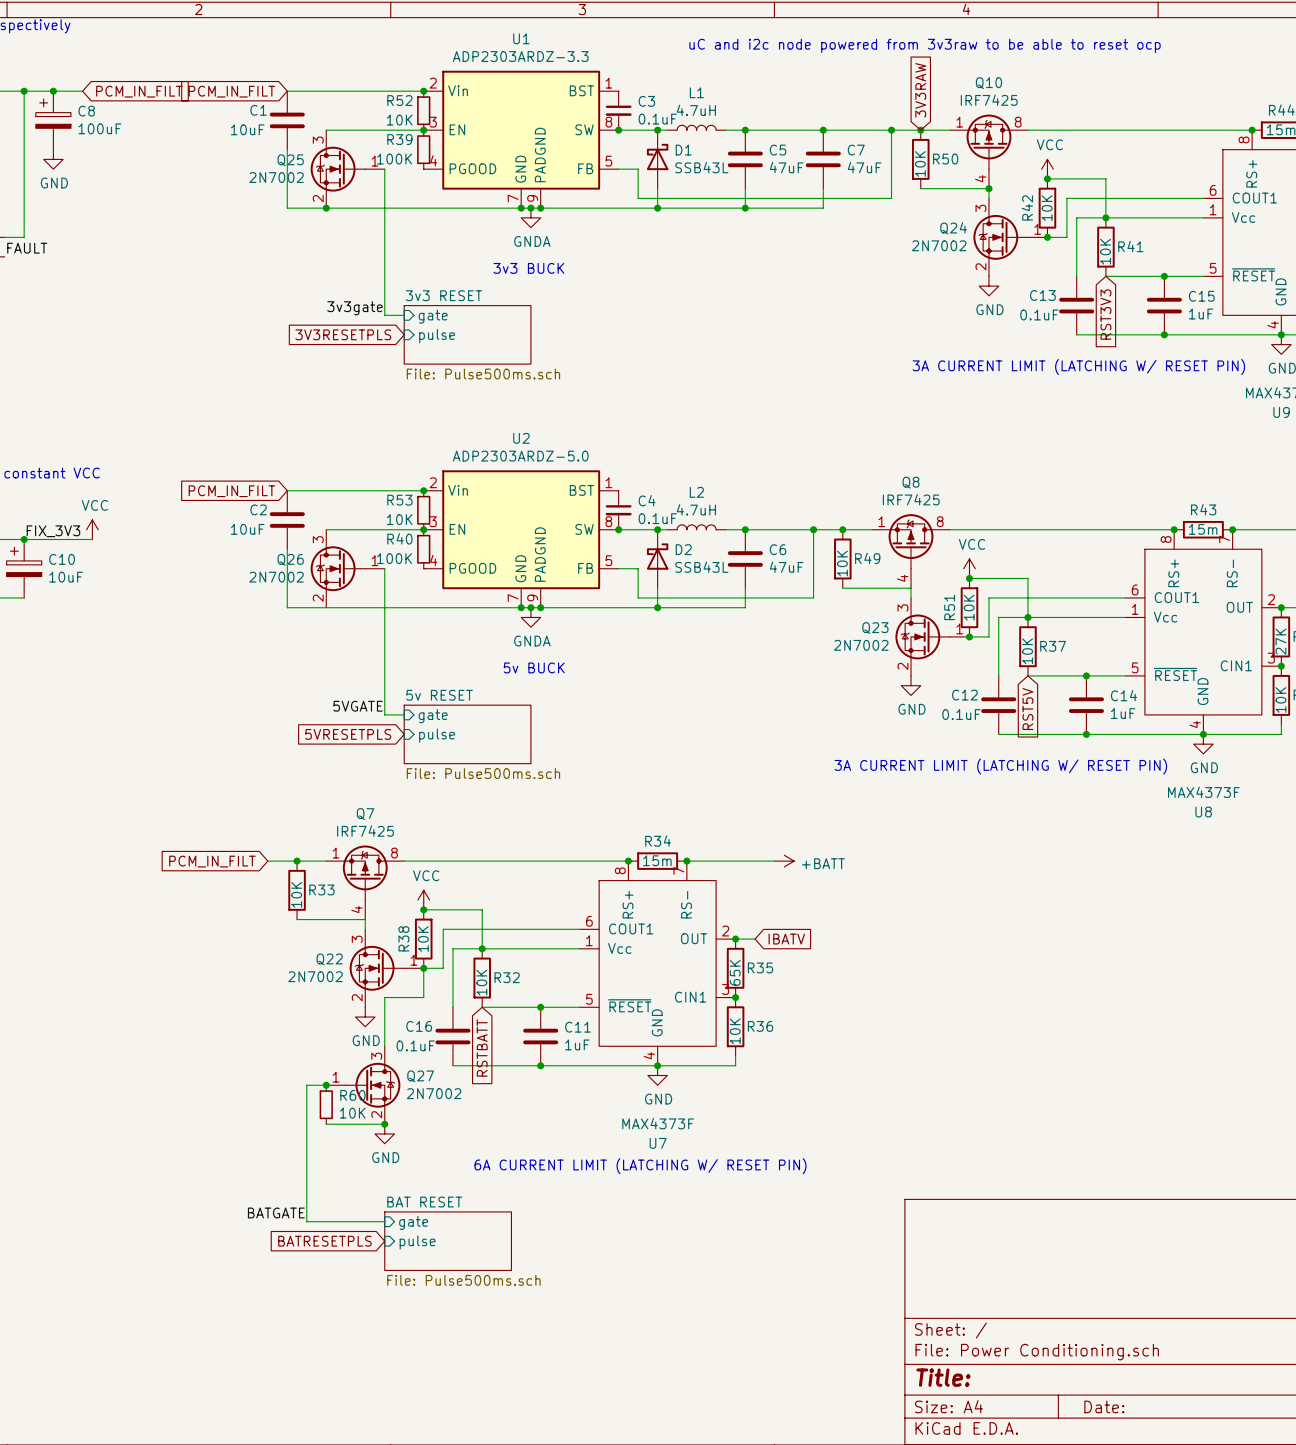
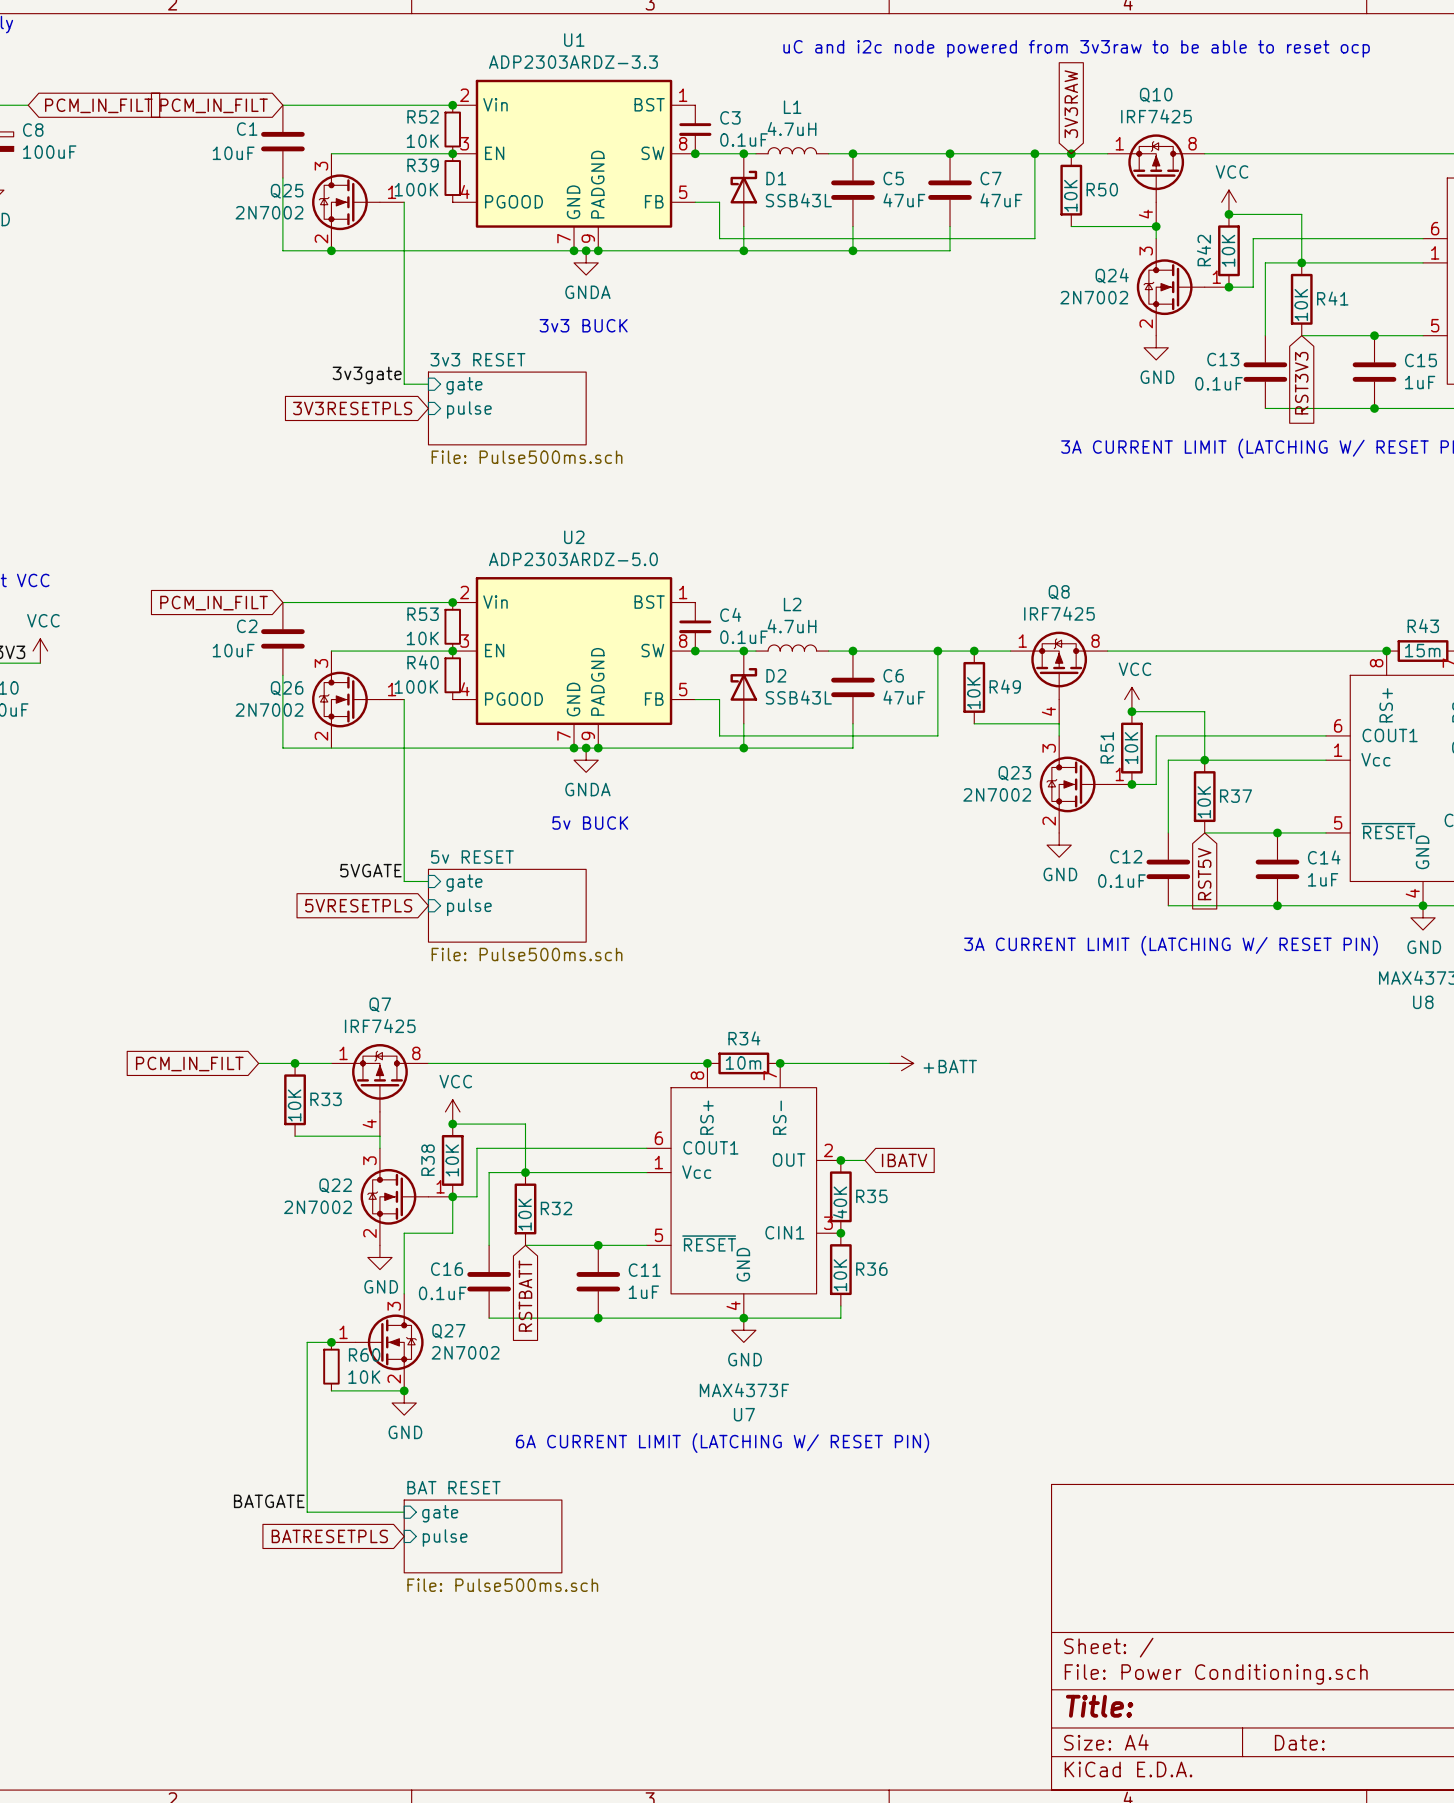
R34 value: 15m (657, 860) -> 10m (743, 1062)
R35 value: 65K (735, 972) -> 40K (840, 1202)

